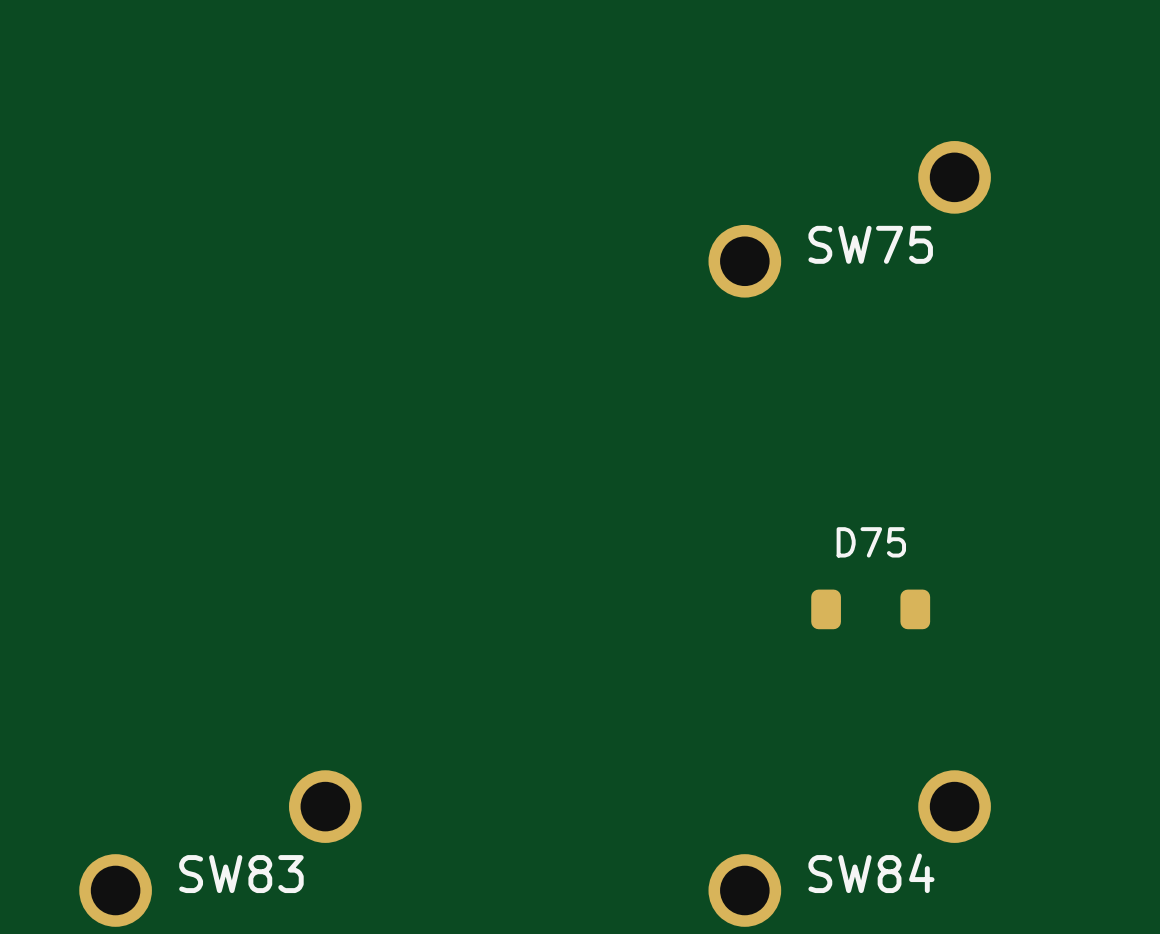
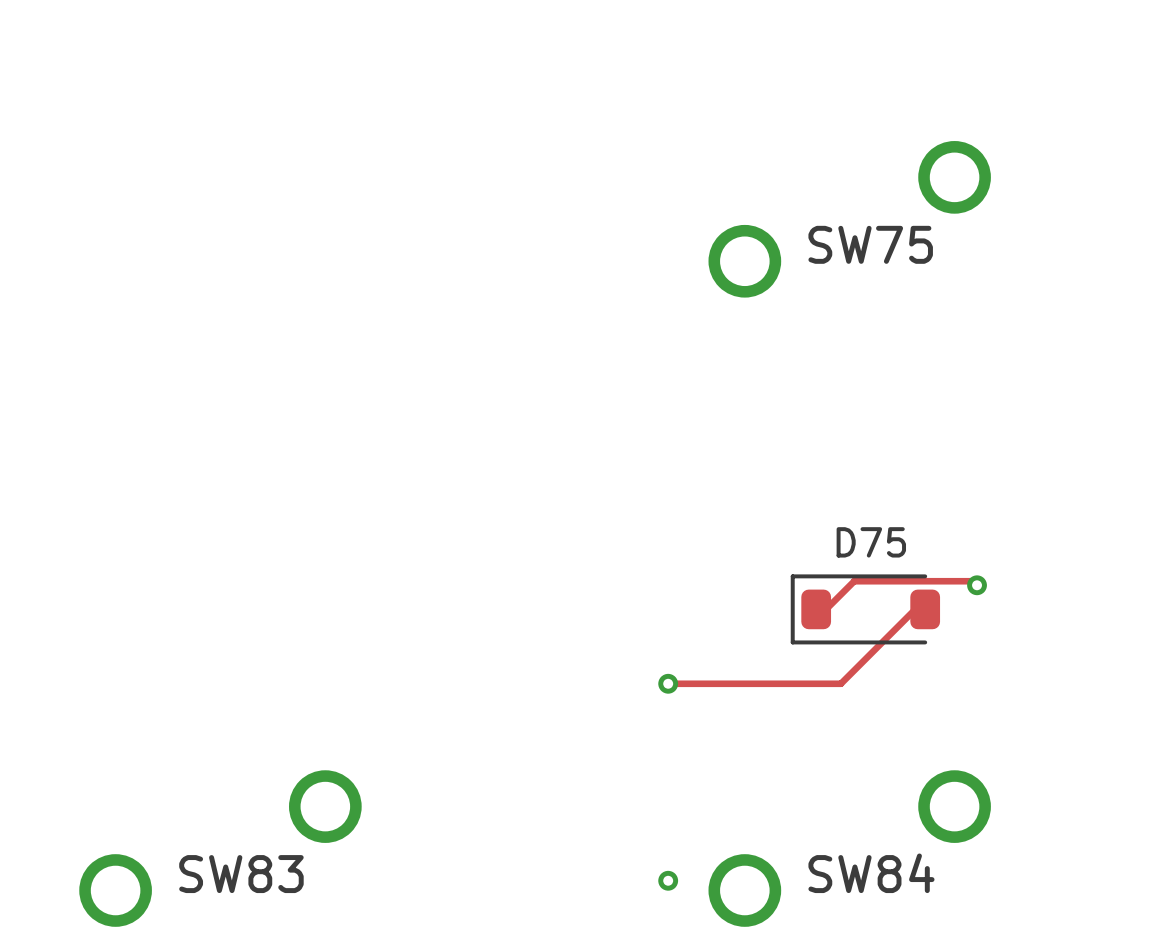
track: none -> (977, 585) (972, 581) (854, 581) (826, 609)
via: none -> (977, 585)
D75 footprint: [811, 589, 931, 630] -> [790, 574, 941, 645]
track: none -> (915, 609) (840, 683) (668, 683)
via: none -> (668, 683)
via: none -> (668, 880)

